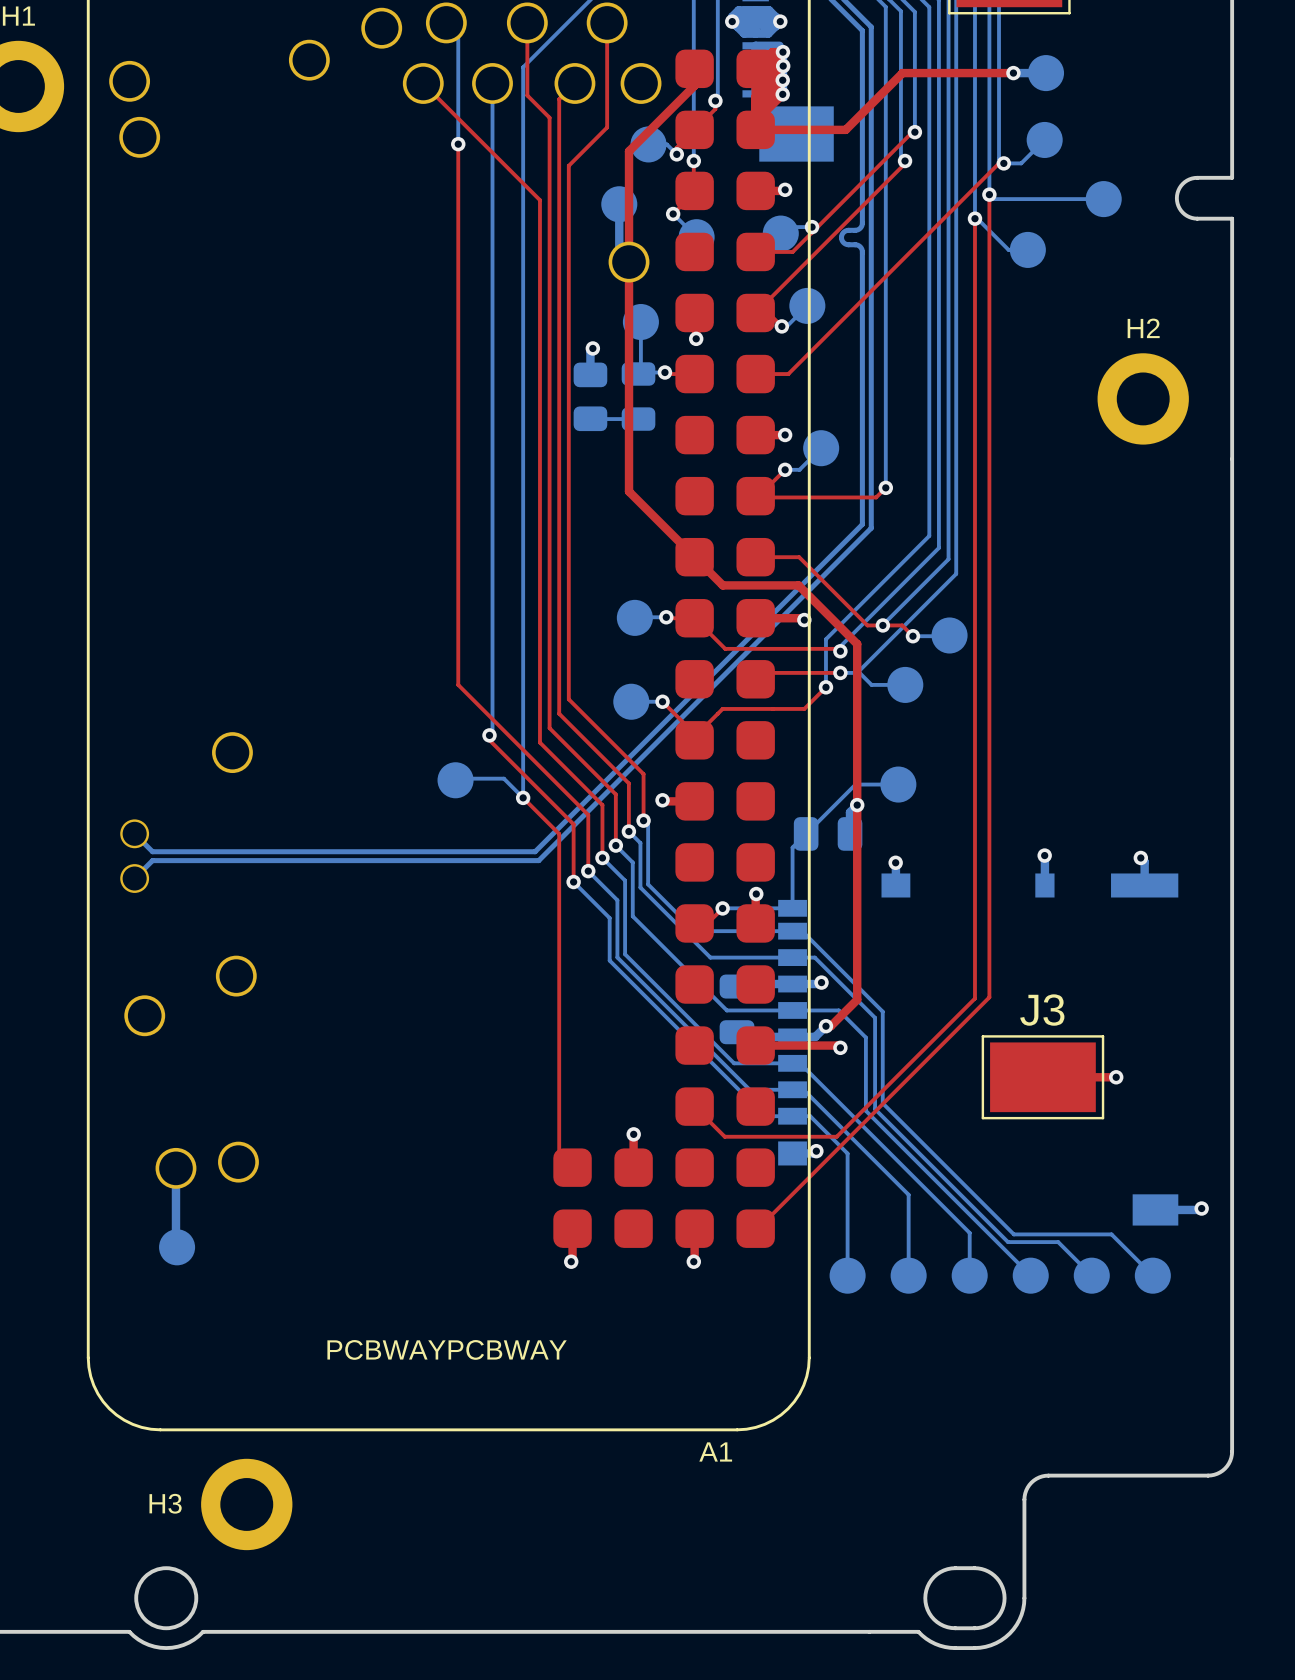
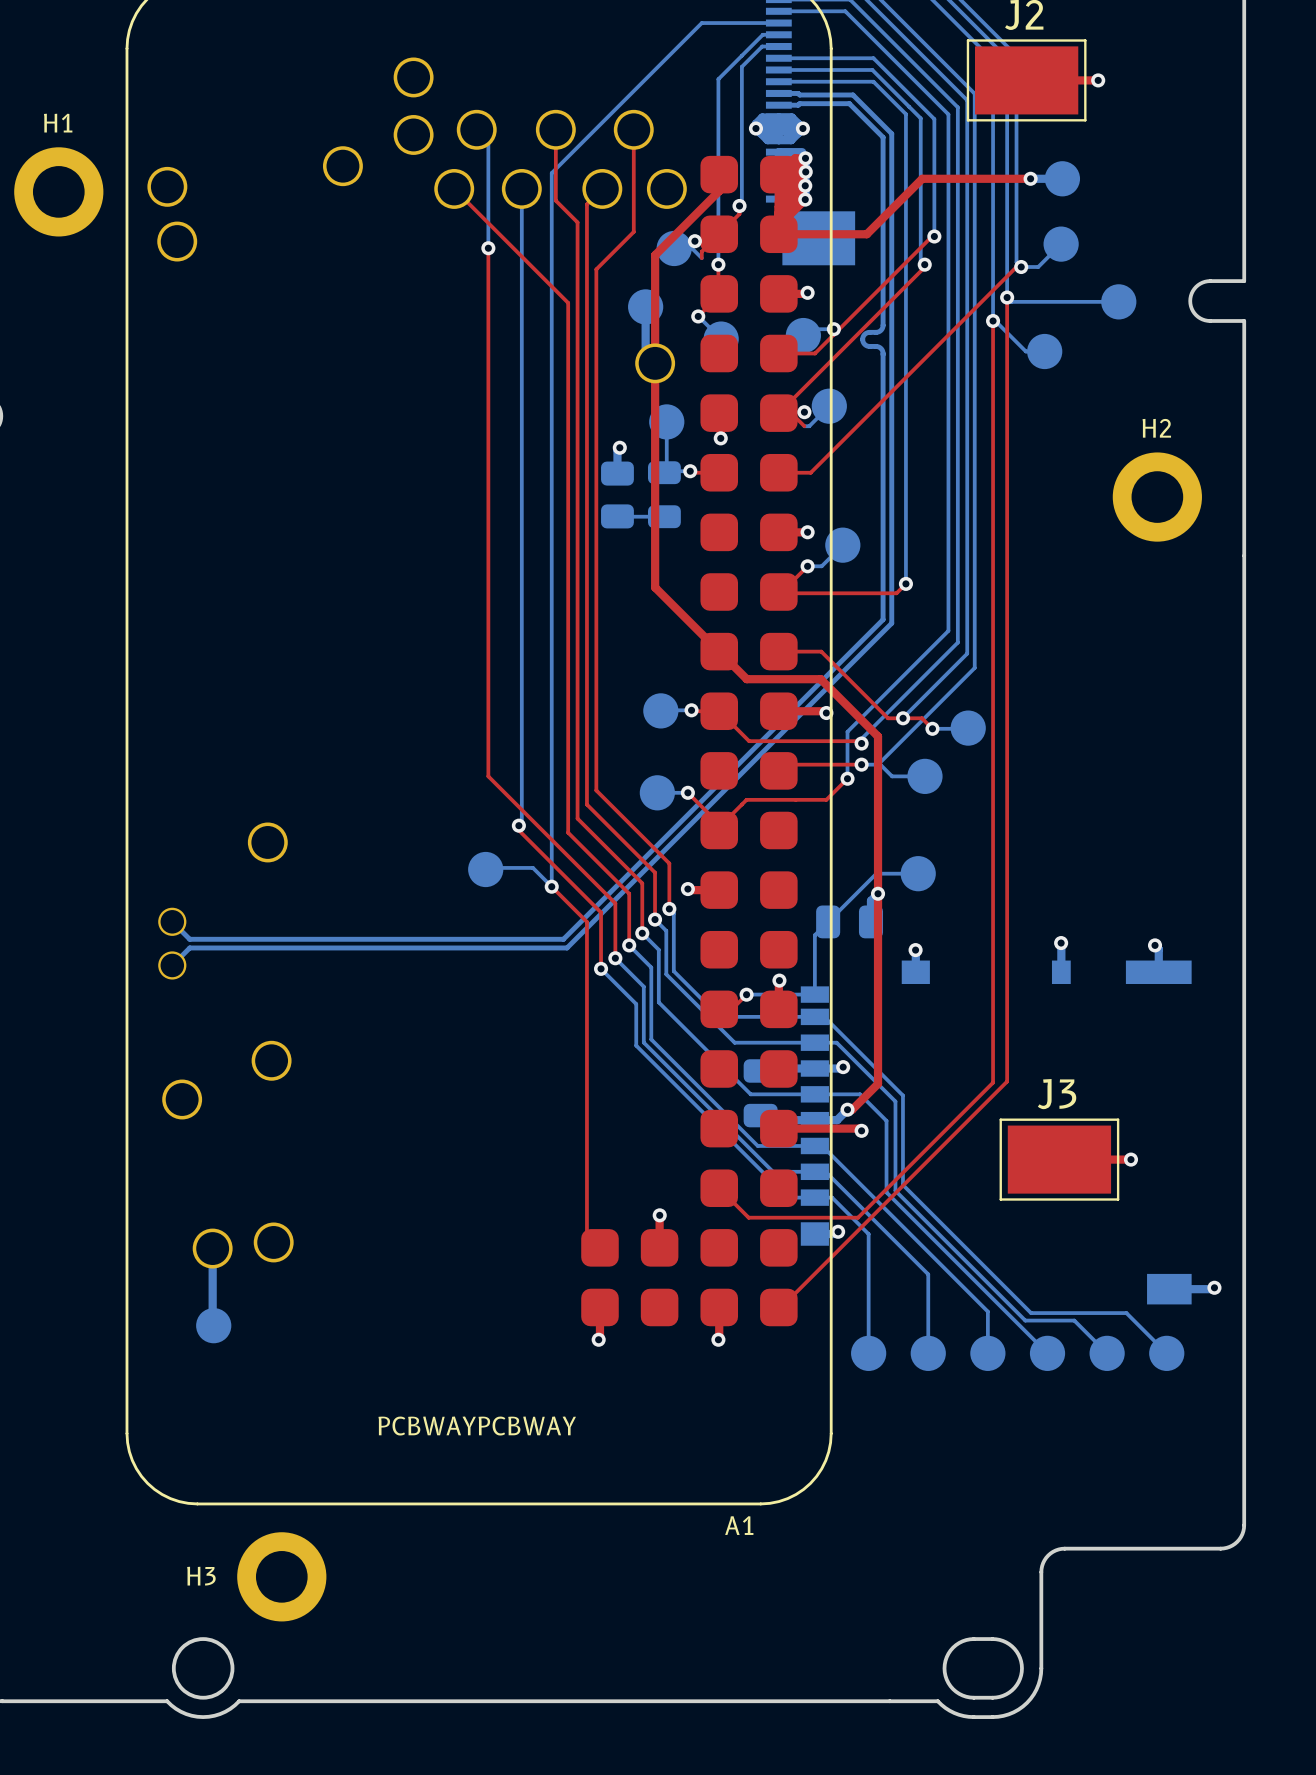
via position: (676, 154) -> (694, 241)
via position: (781, 326) -> (804, 412)

